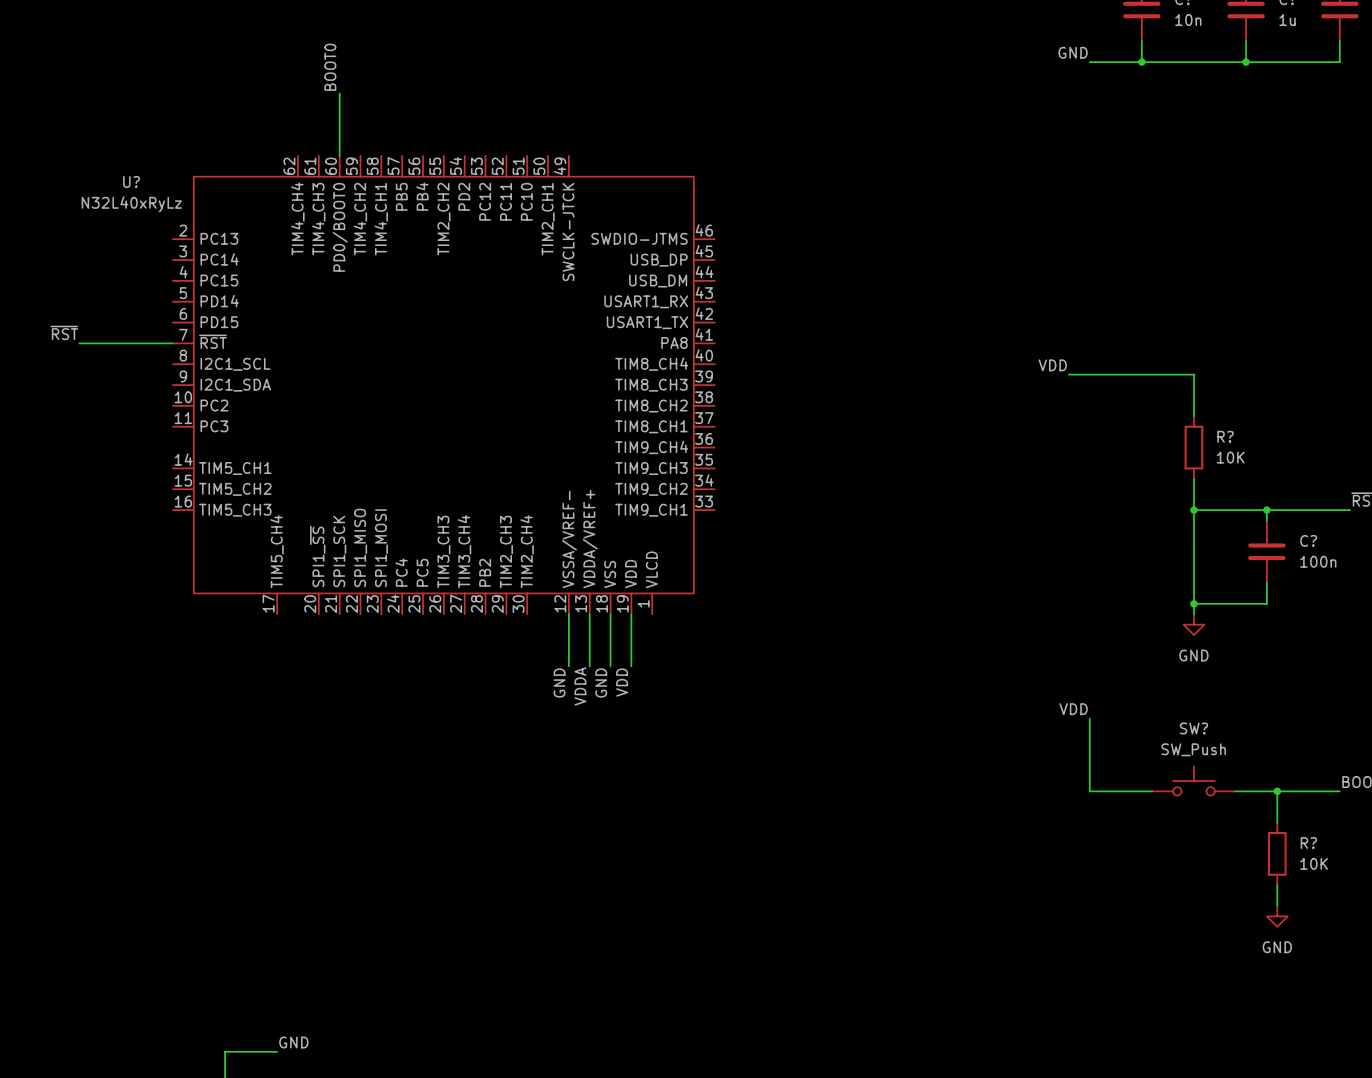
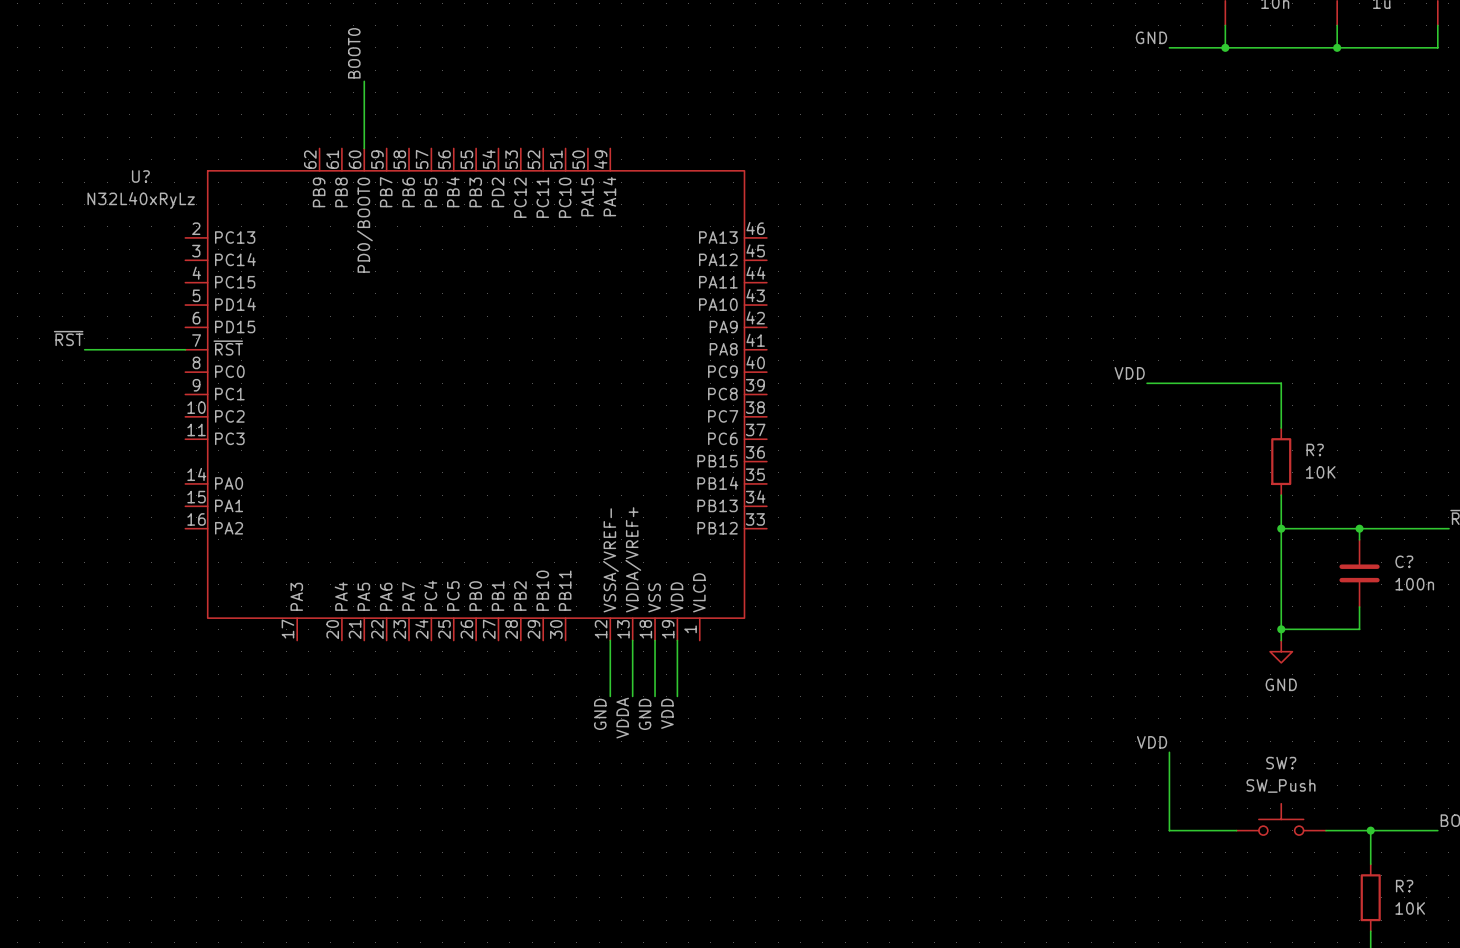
U? symbol: [172, 155, 715, 615] -> [185, 148, 767, 641]

